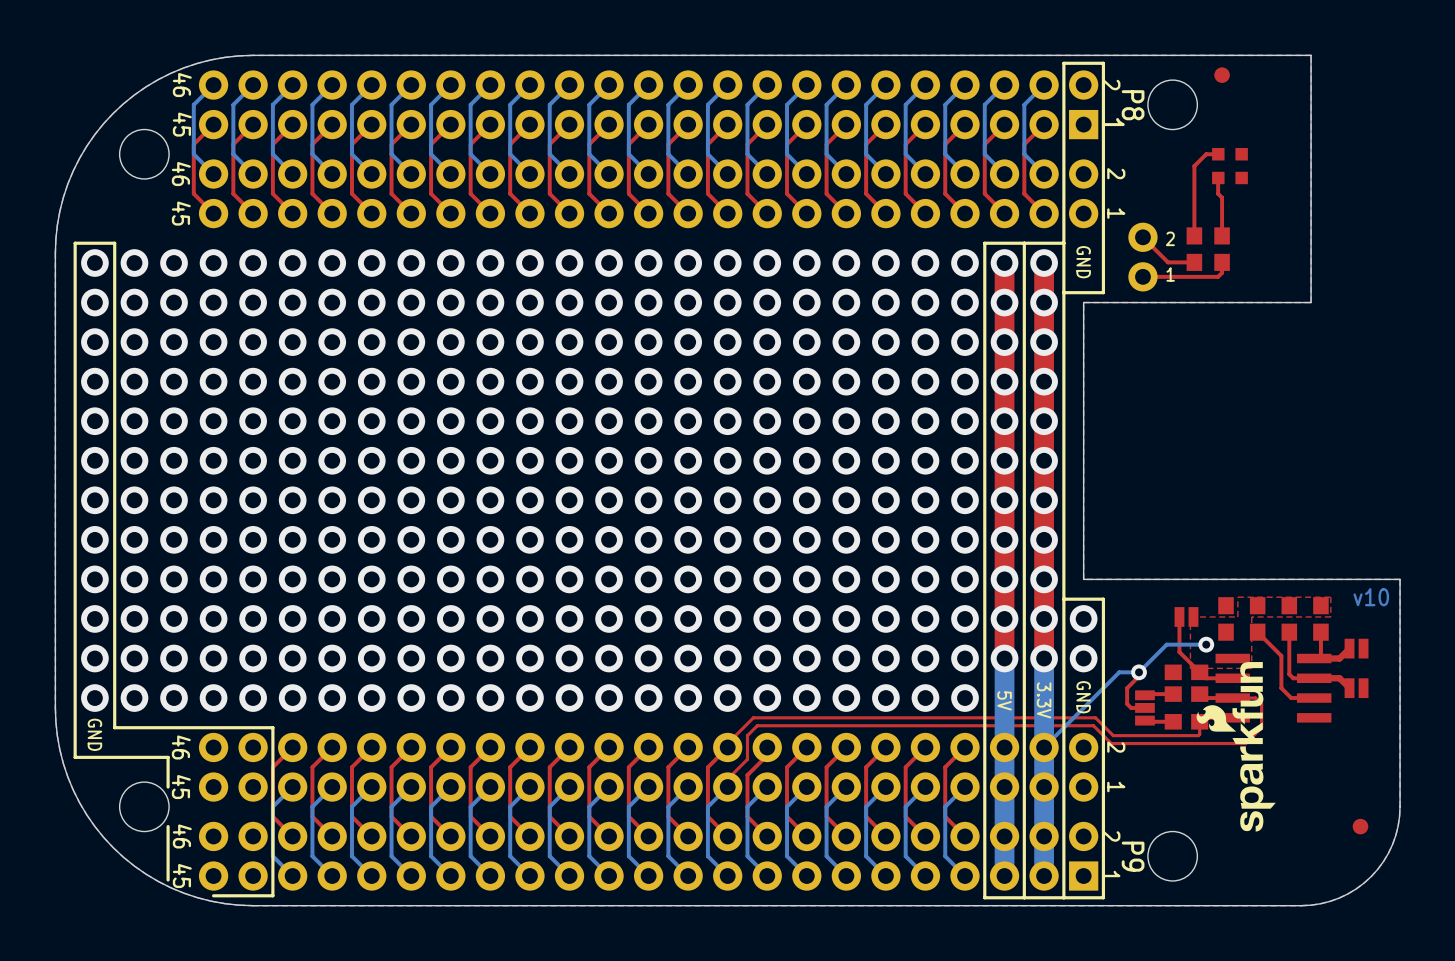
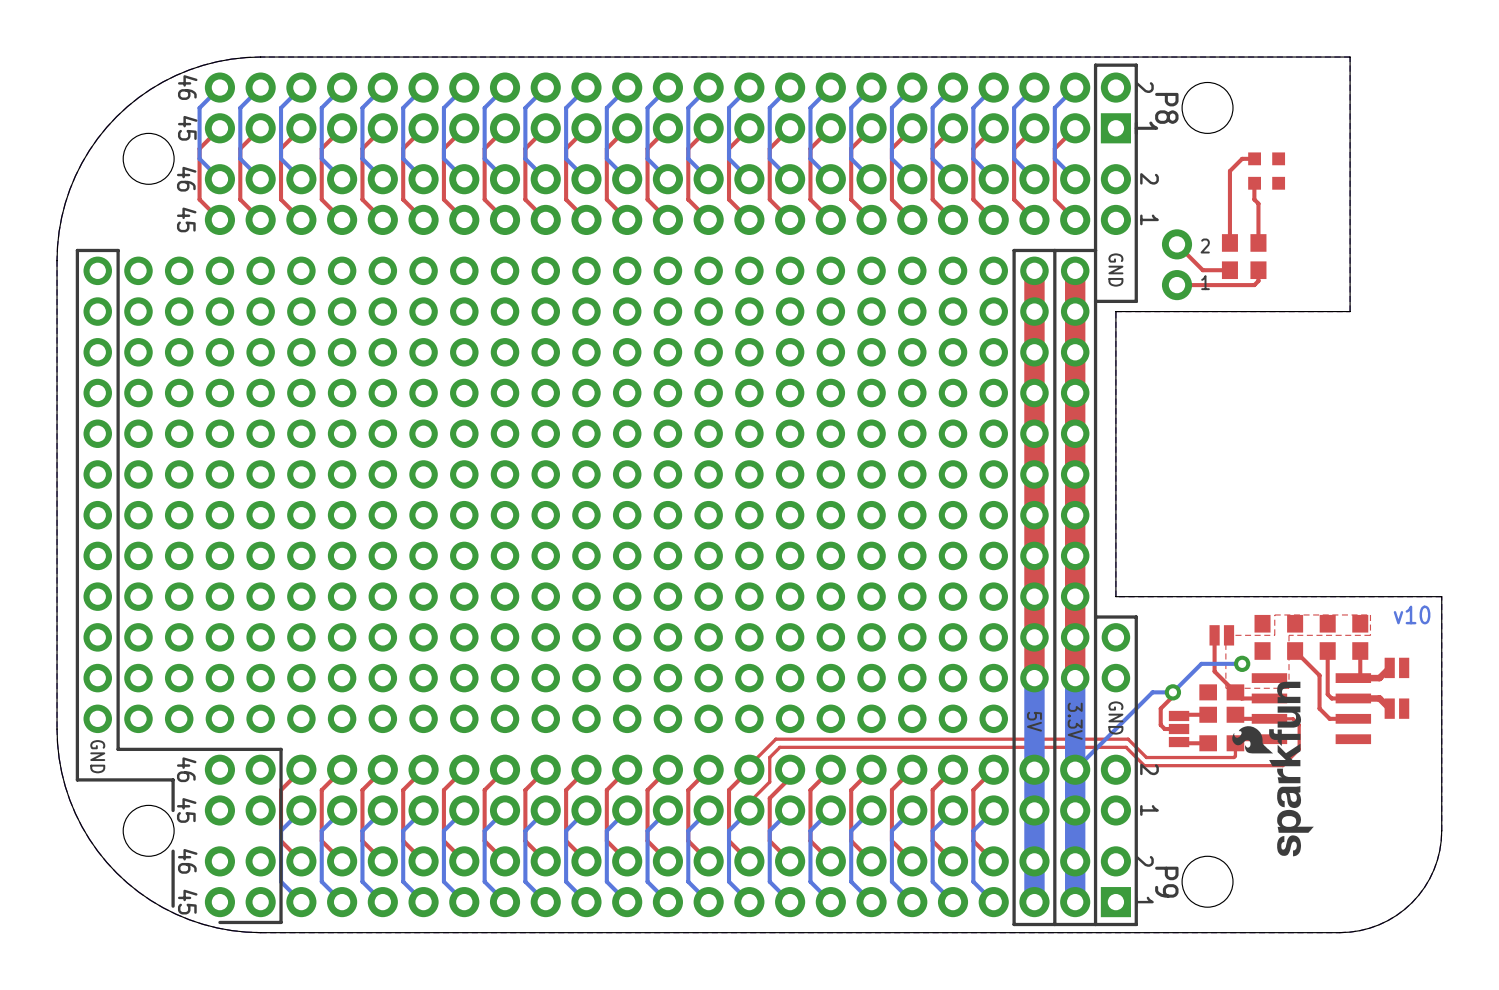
part: (1222, 75) -> none
part: (1360, 826) -> none

